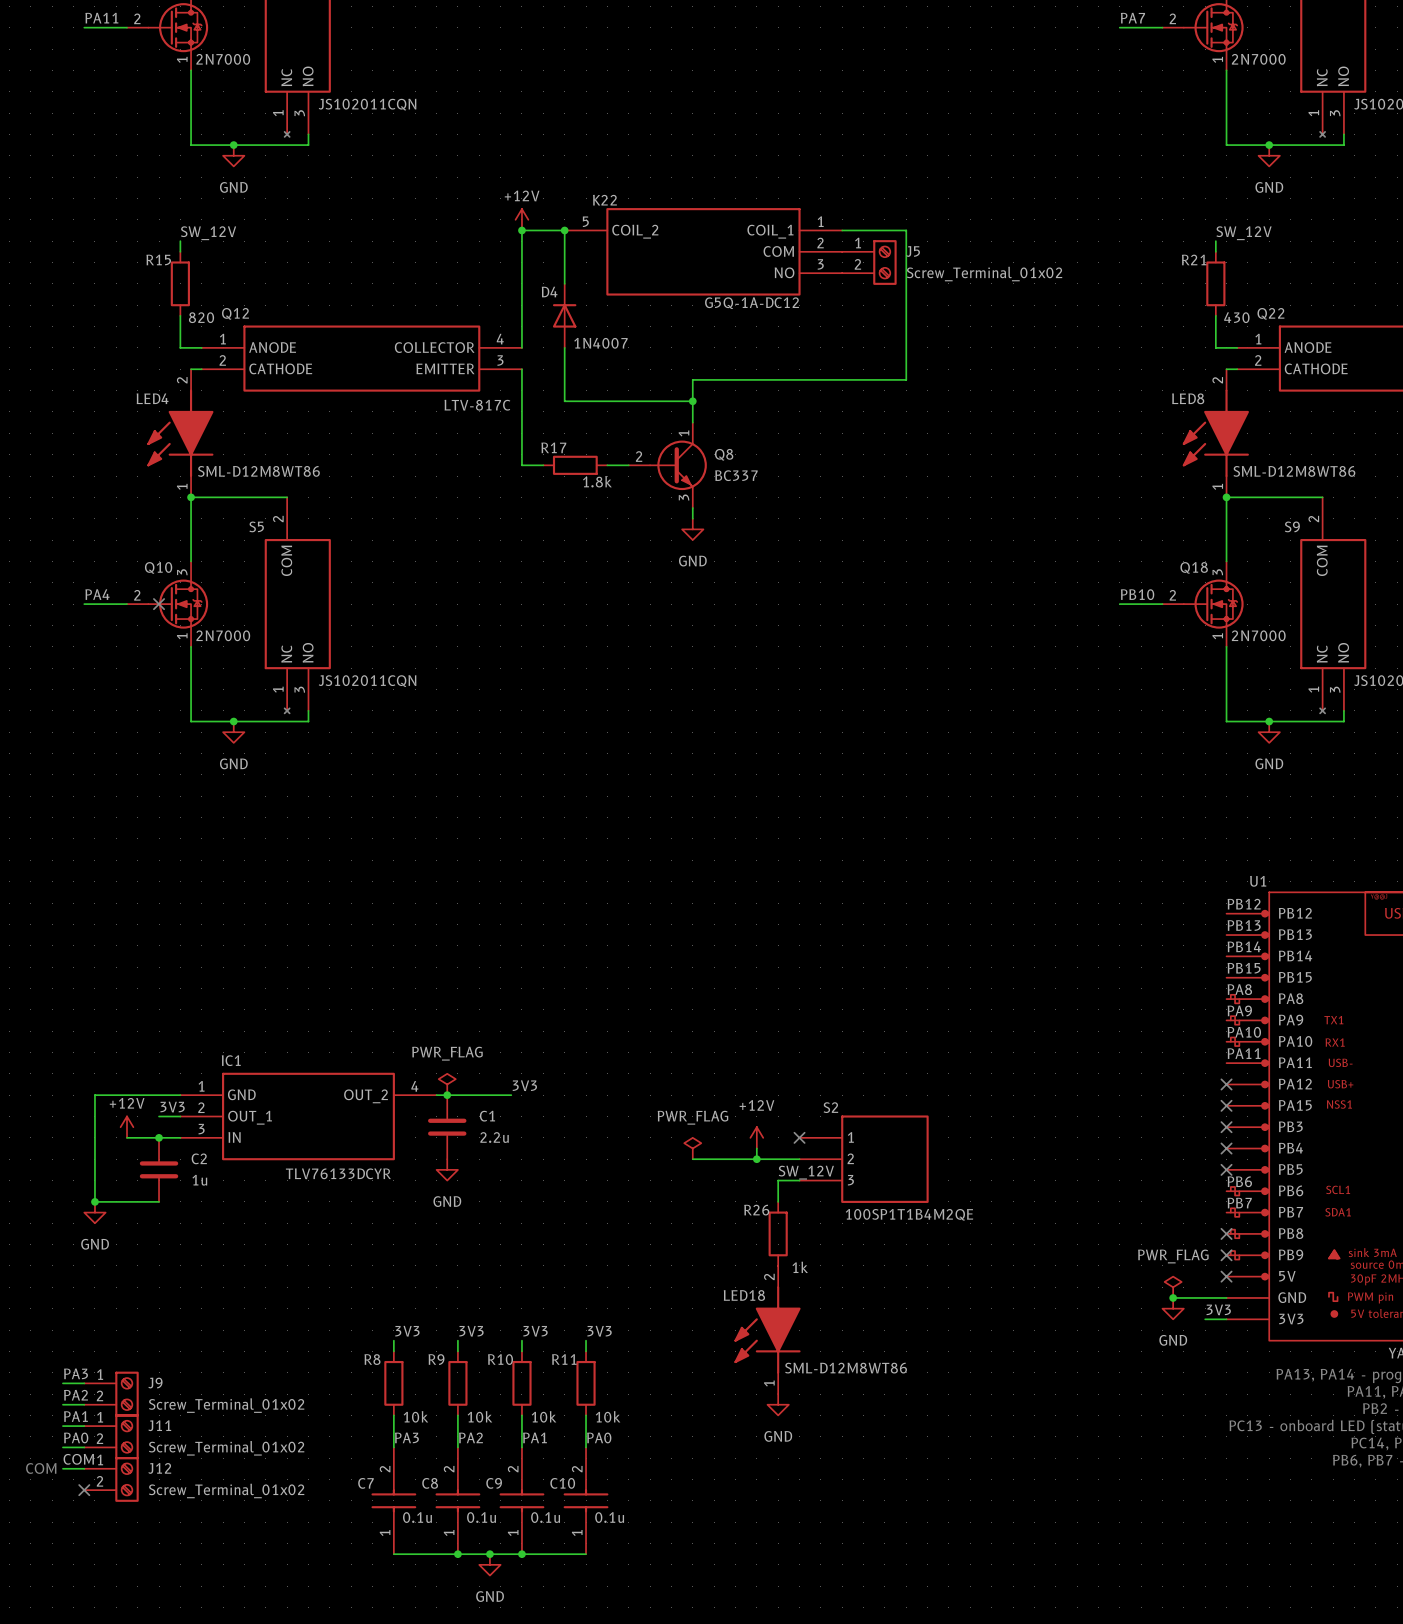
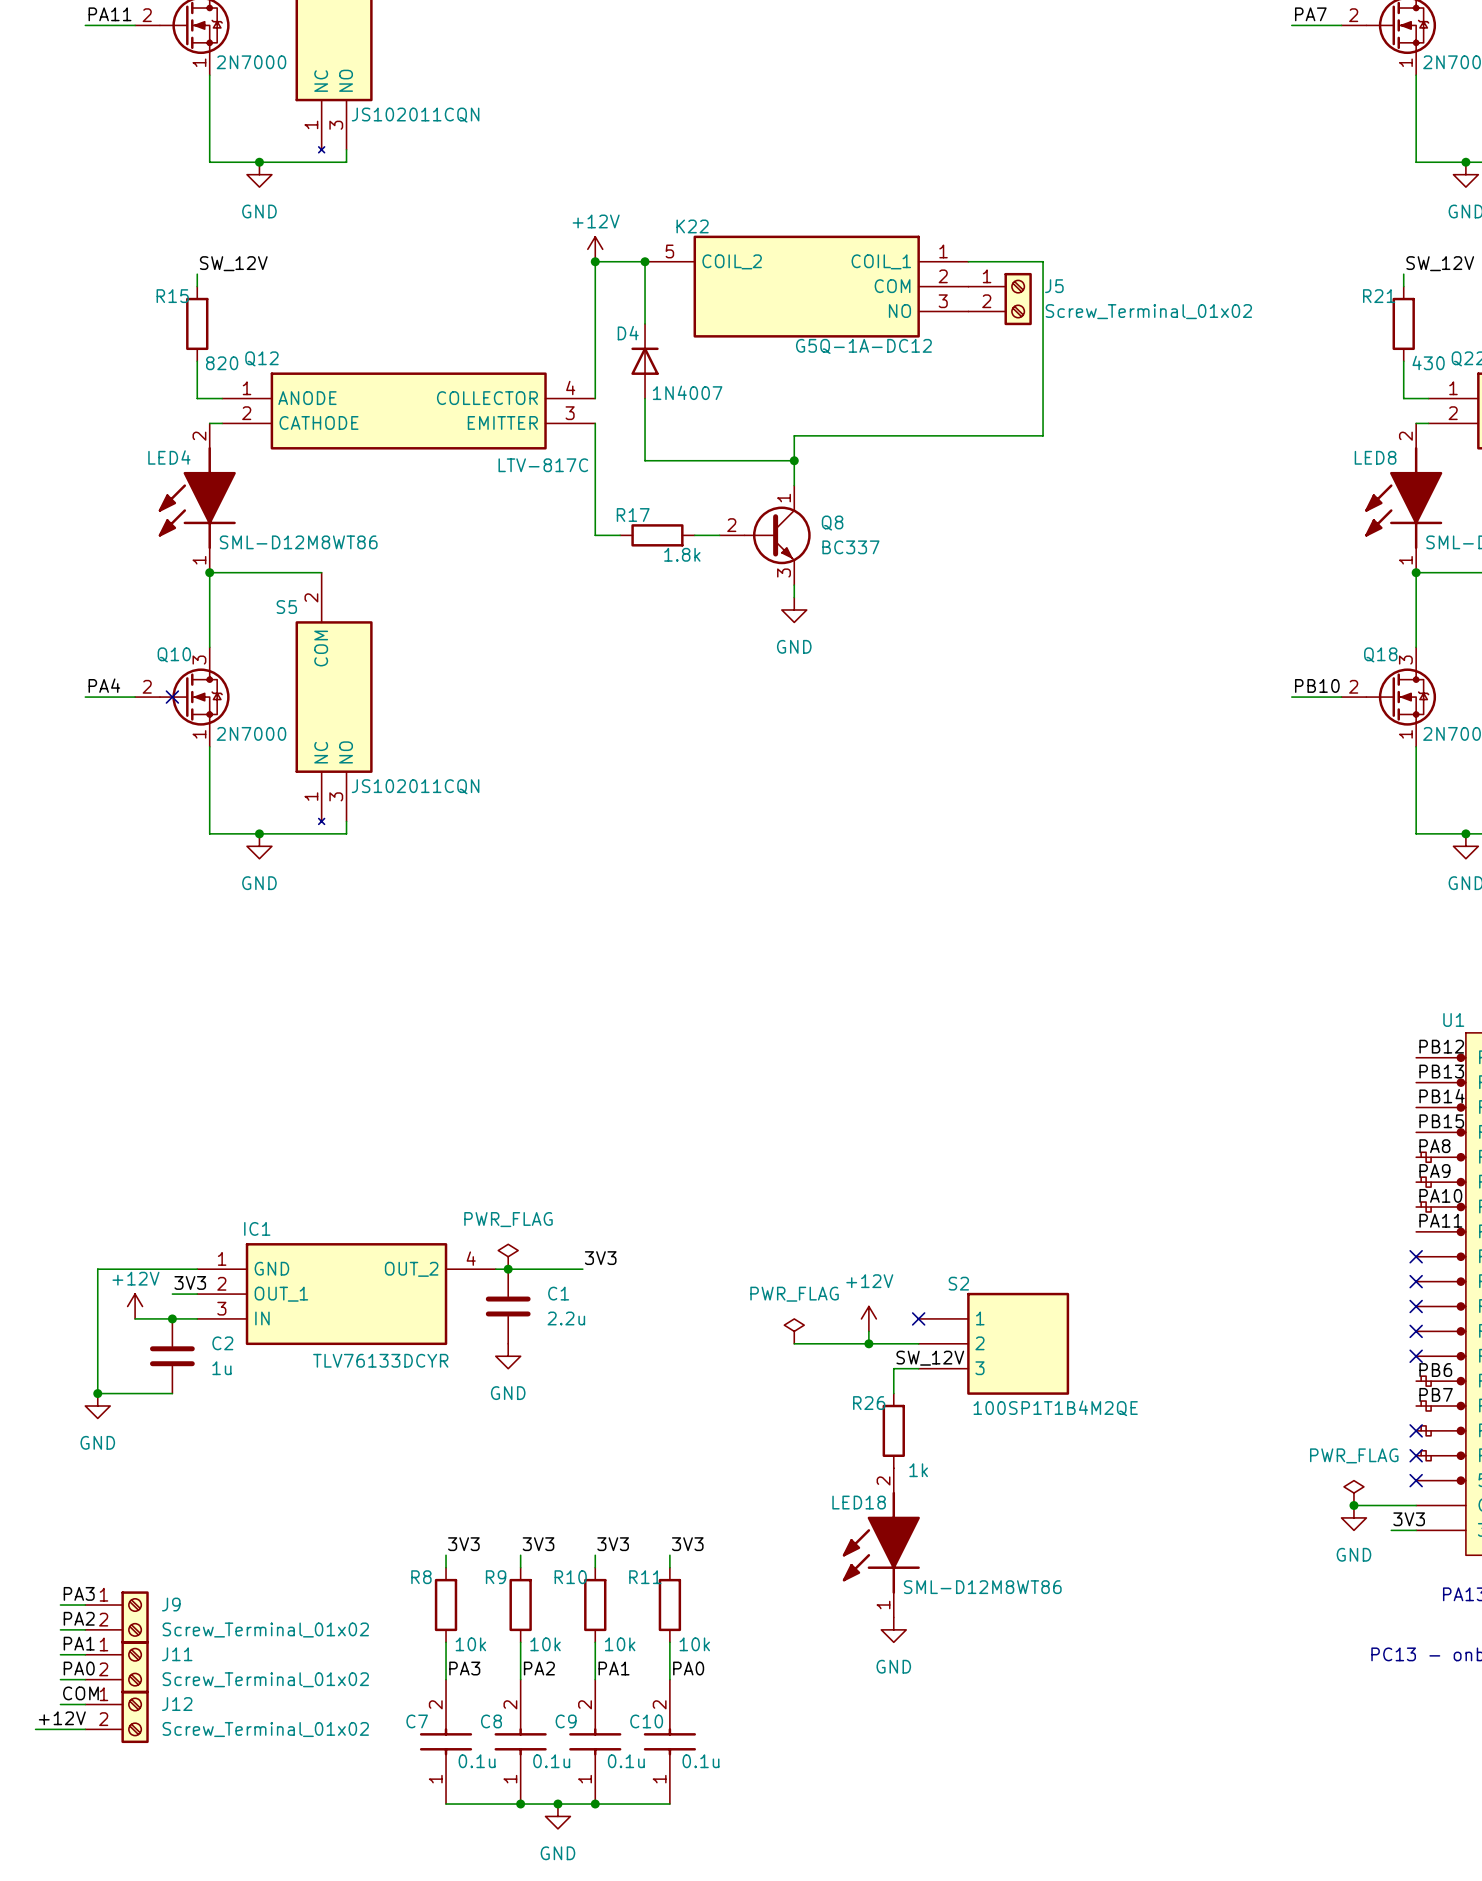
text: COM (41, 1468) -> none
label: none -> +12V (62, 1718)
wire: none -> (35, 1729) (85, 1729)
no-connect mark: (84, 1490) -> none

